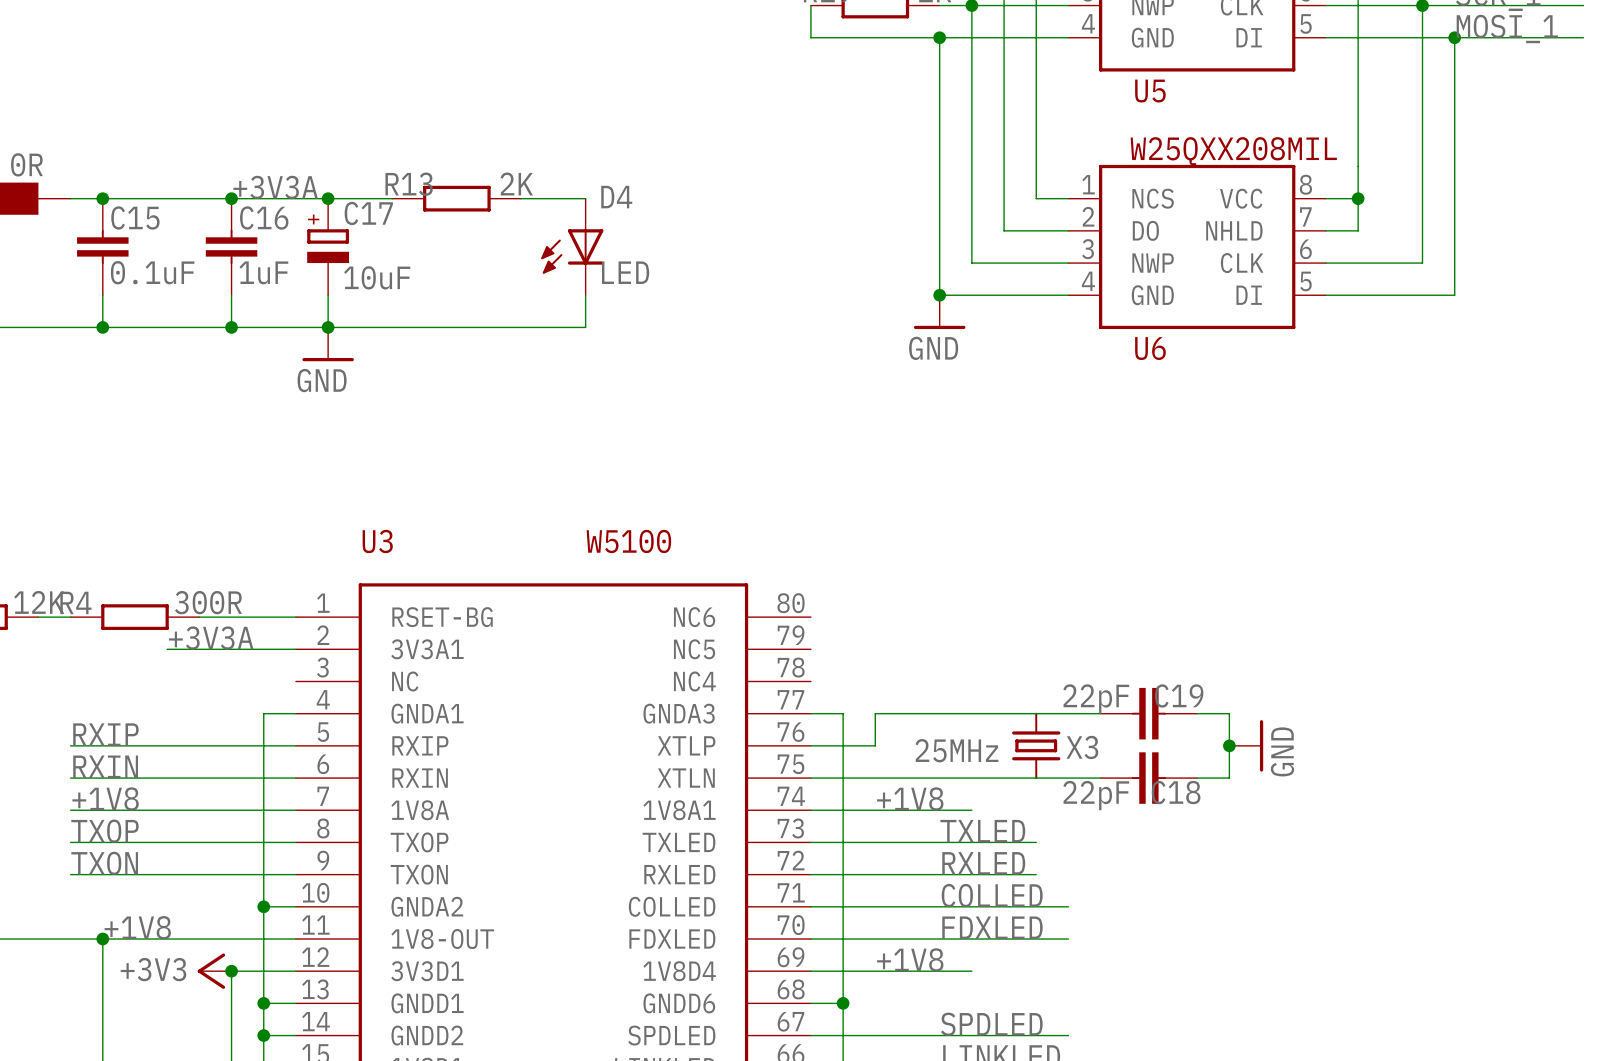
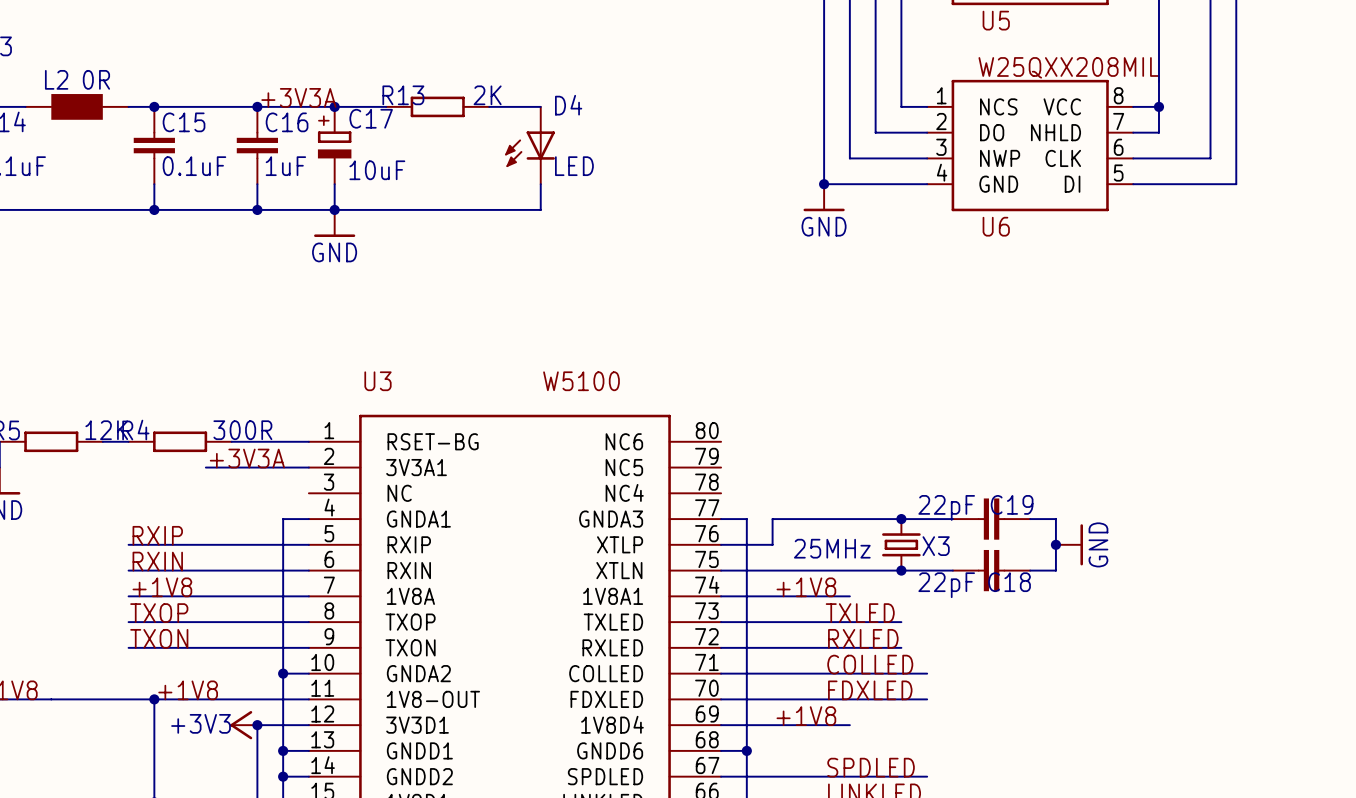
junction: none -> (901, 519)
junction: none -> (901, 570)

